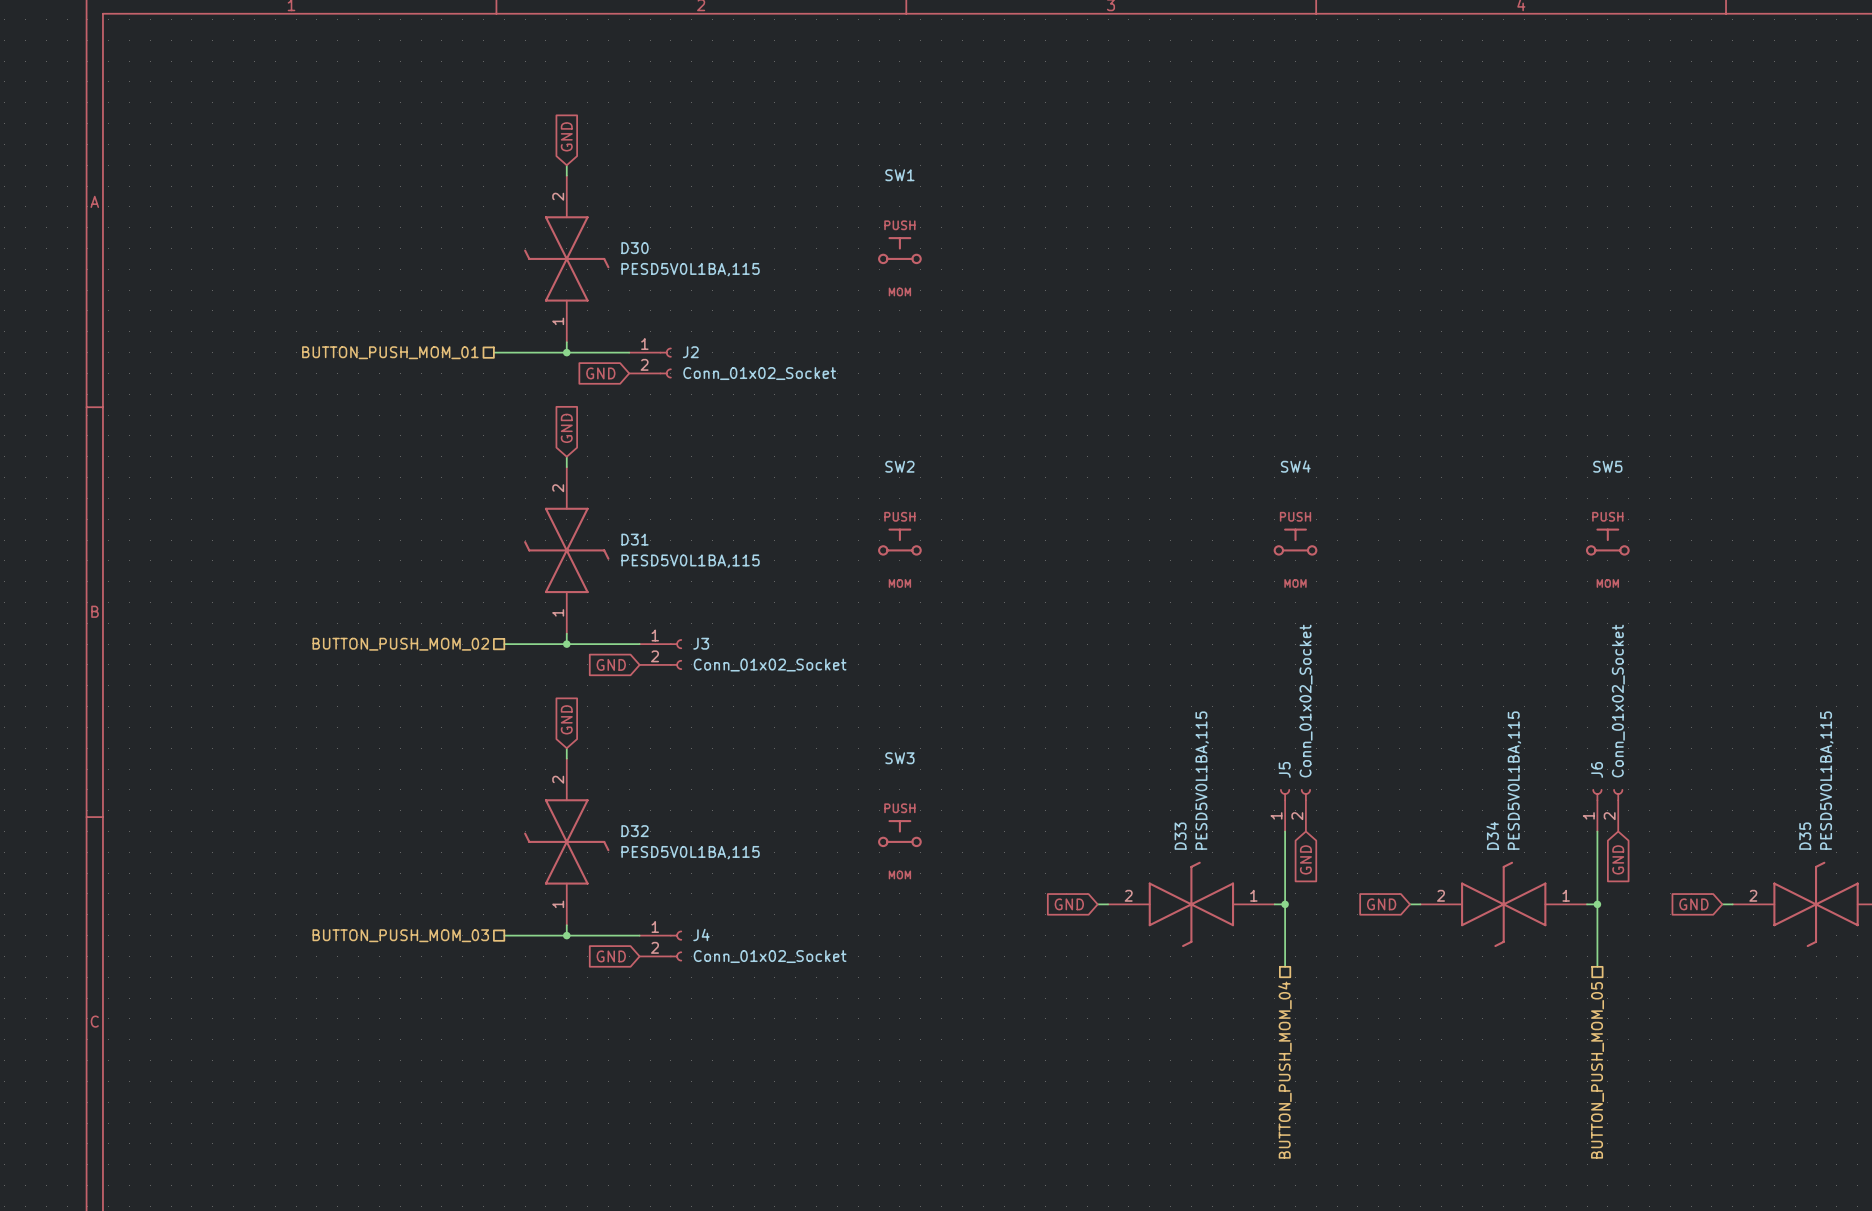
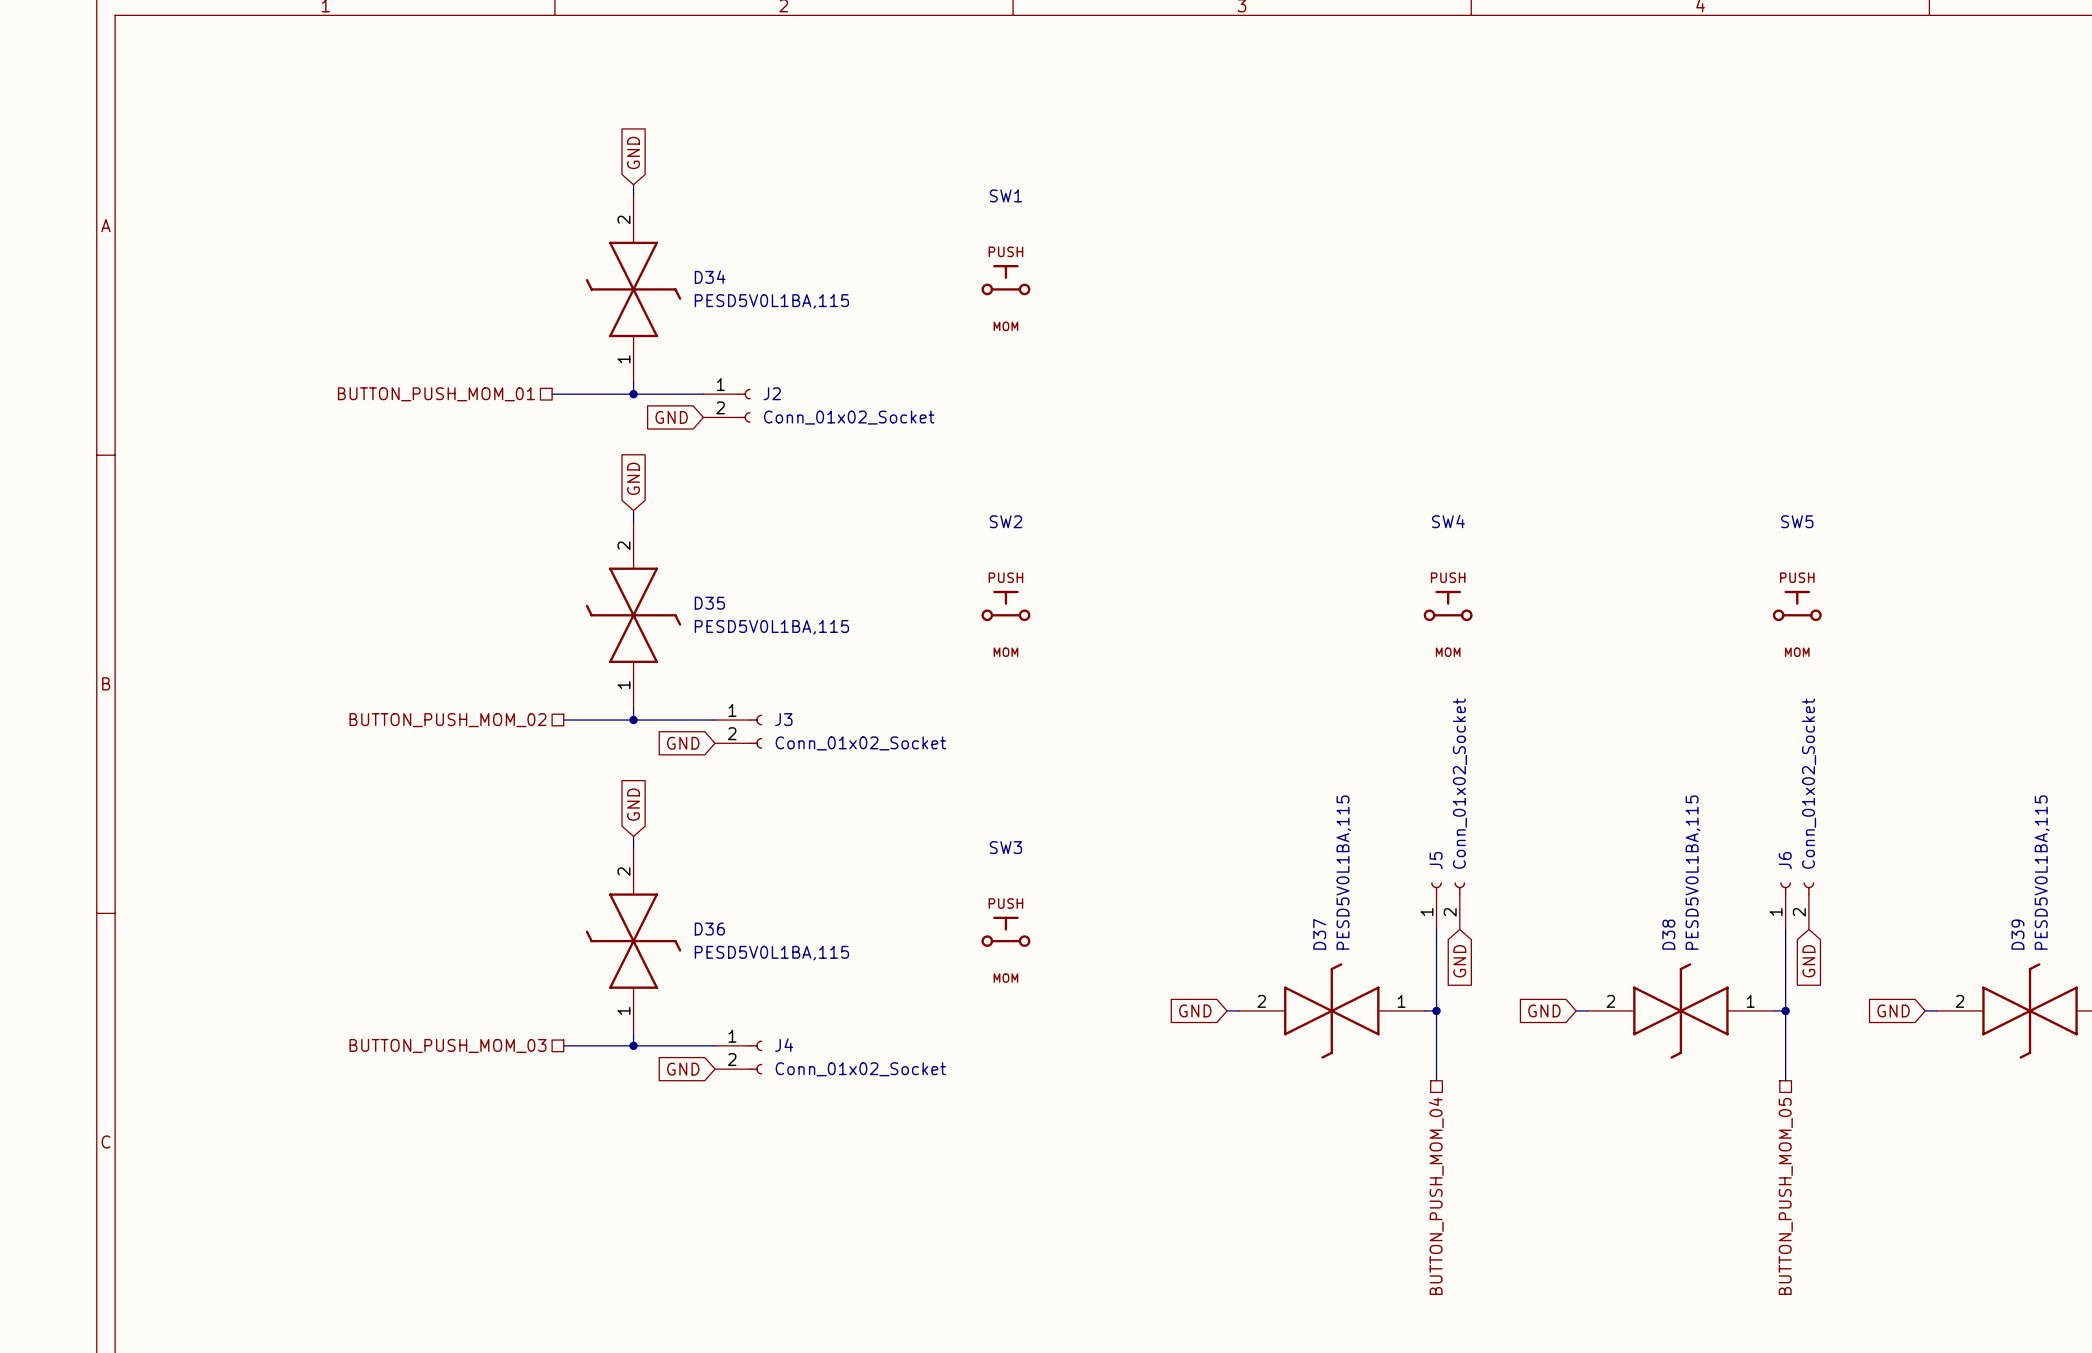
D30 name: D30 (635, 248) -> D34 (710, 277)
D31 name: D31 (635, 539) -> D35 (709, 603)
D32 name: D32 (635, 831) -> D36 (709, 929)
D34 name: D34 (1492, 835) -> D38 (1668, 934)
D33 name: D33 (1180, 836) -> D37 (1319, 934)
D35 name: D35 (1805, 836) -> D39 (2017, 934)

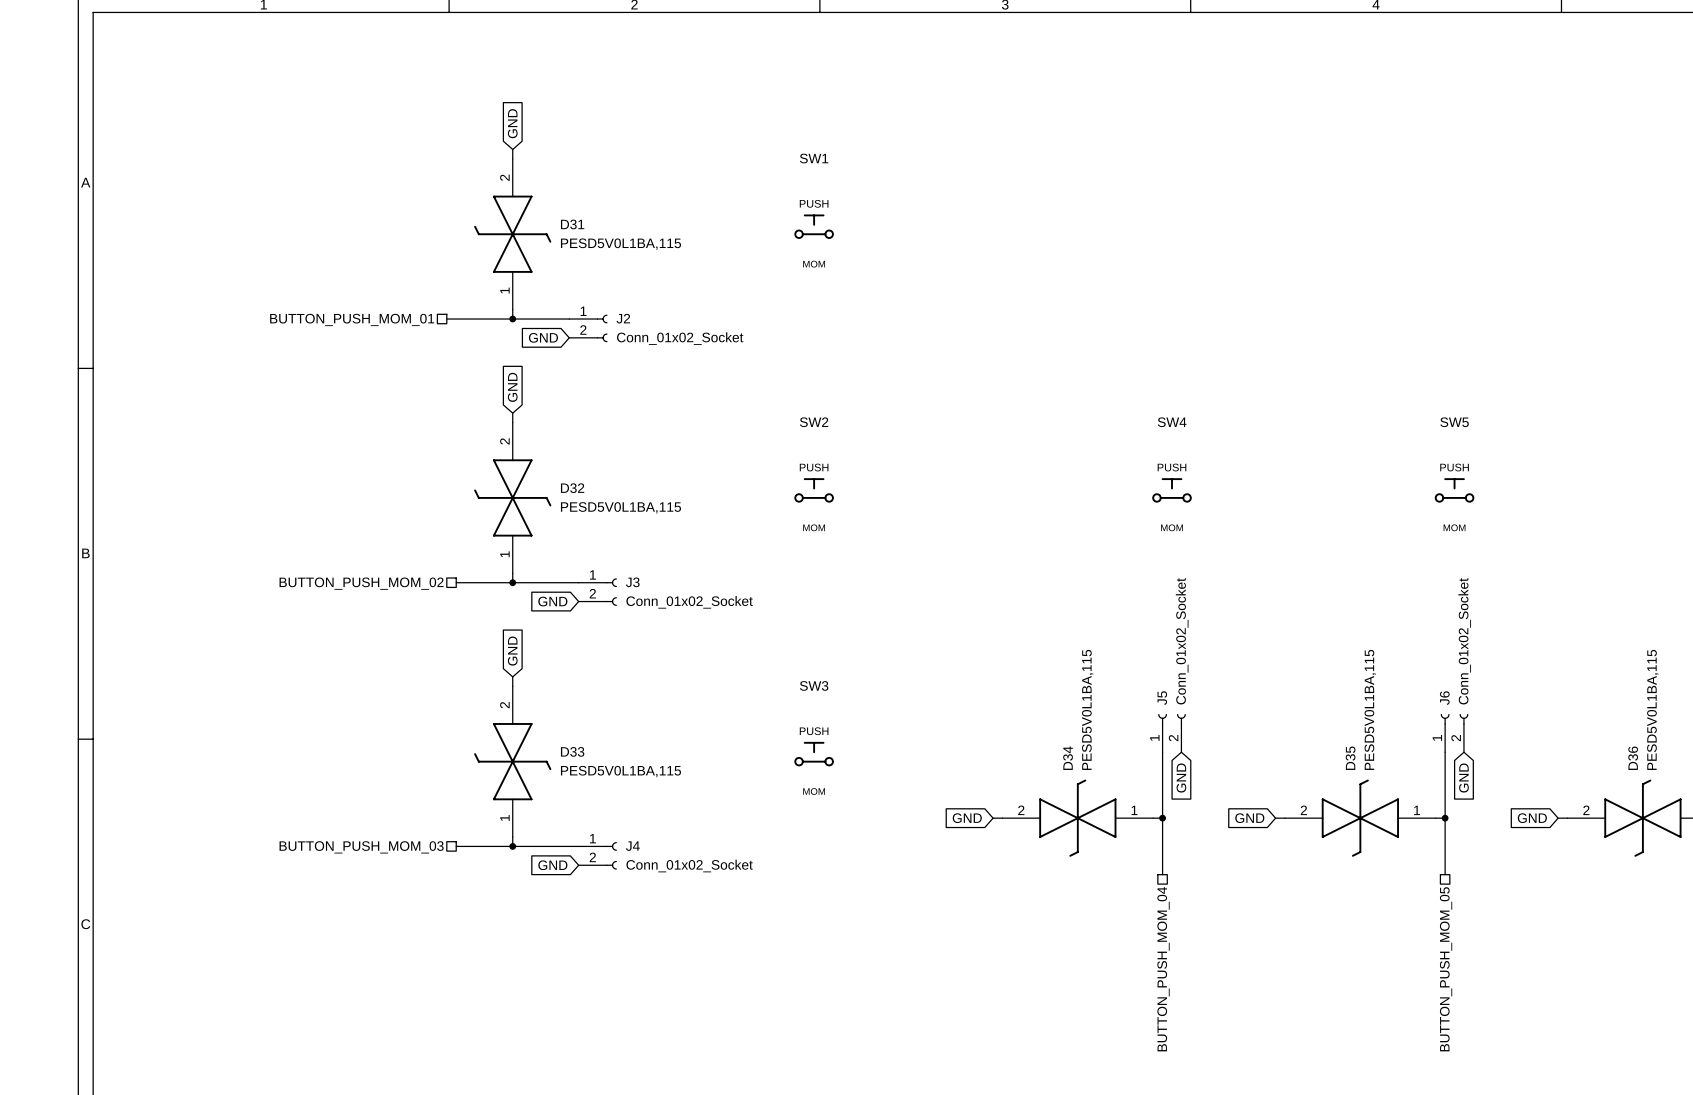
D34 name: D34 (710, 277) -> D31 (572, 224)
D35 name: D35 (709, 603) -> D32 (572, 488)
D36 name: D36 (709, 929) -> D33 (572, 751)
D37 name: D37 (1319, 934) -> D34 (1068, 758)
D38 name: D38 (1668, 934) -> D35 (1350, 758)
D39 name: D39 (2017, 934) -> D36 (1633, 758)

